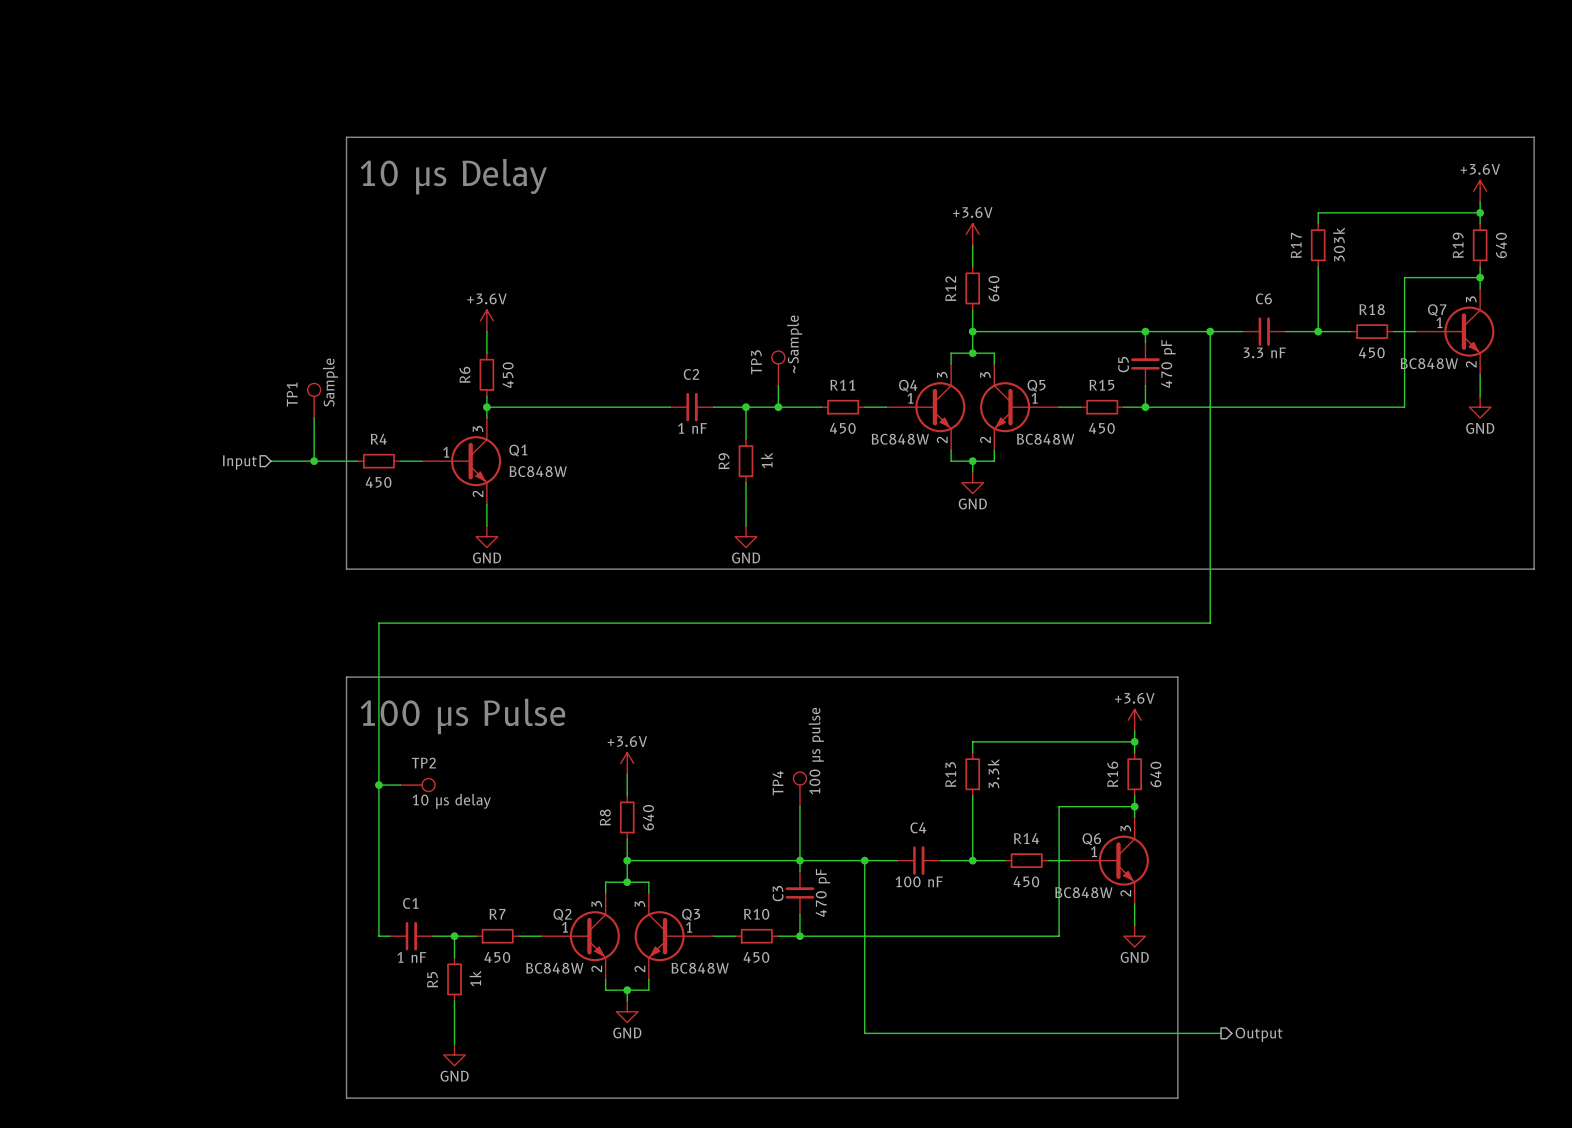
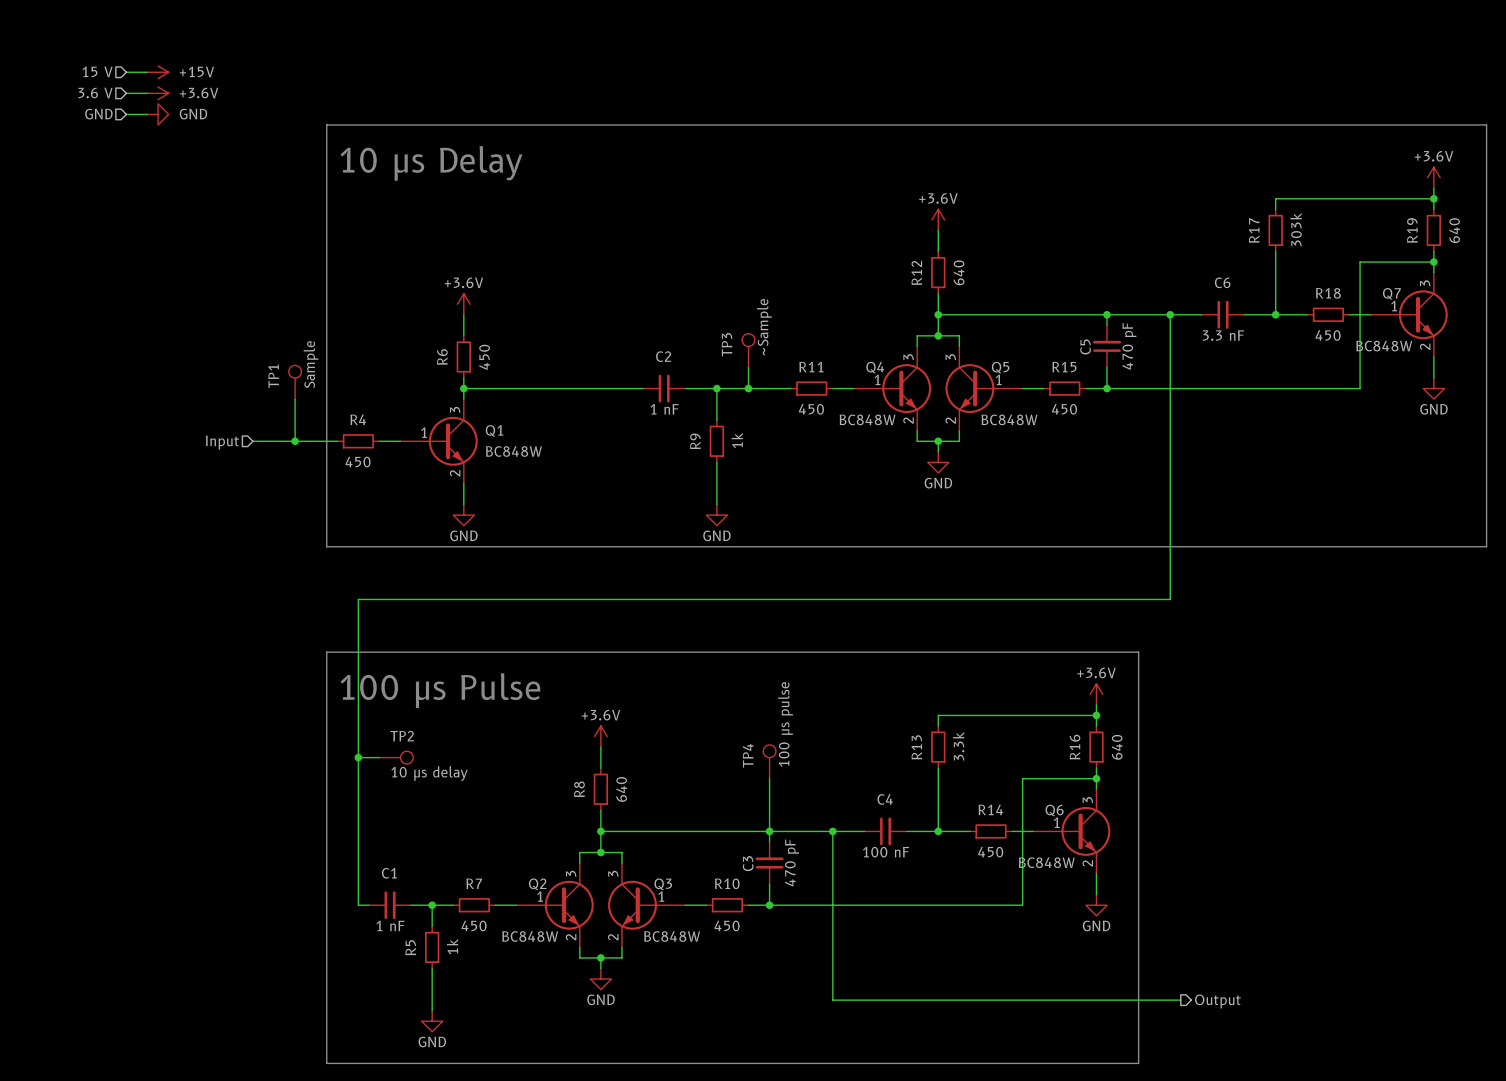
hierarchical label: none -> 15 V (97, 71)
wire: none -> (126, 72) (147, 72)
power symbol: none -> +15V (158, 72)
hierarchical label: none -> 3.6 V (95, 93)
wire: none -> (126, 93) (147, 93)
power symbol: none -> +3.6V (158, 93)
hierarchical label: none -> GND (98, 114)
wire: none -> (126, 114) (147, 114)
power symbol: none -> GND (158, 114)

